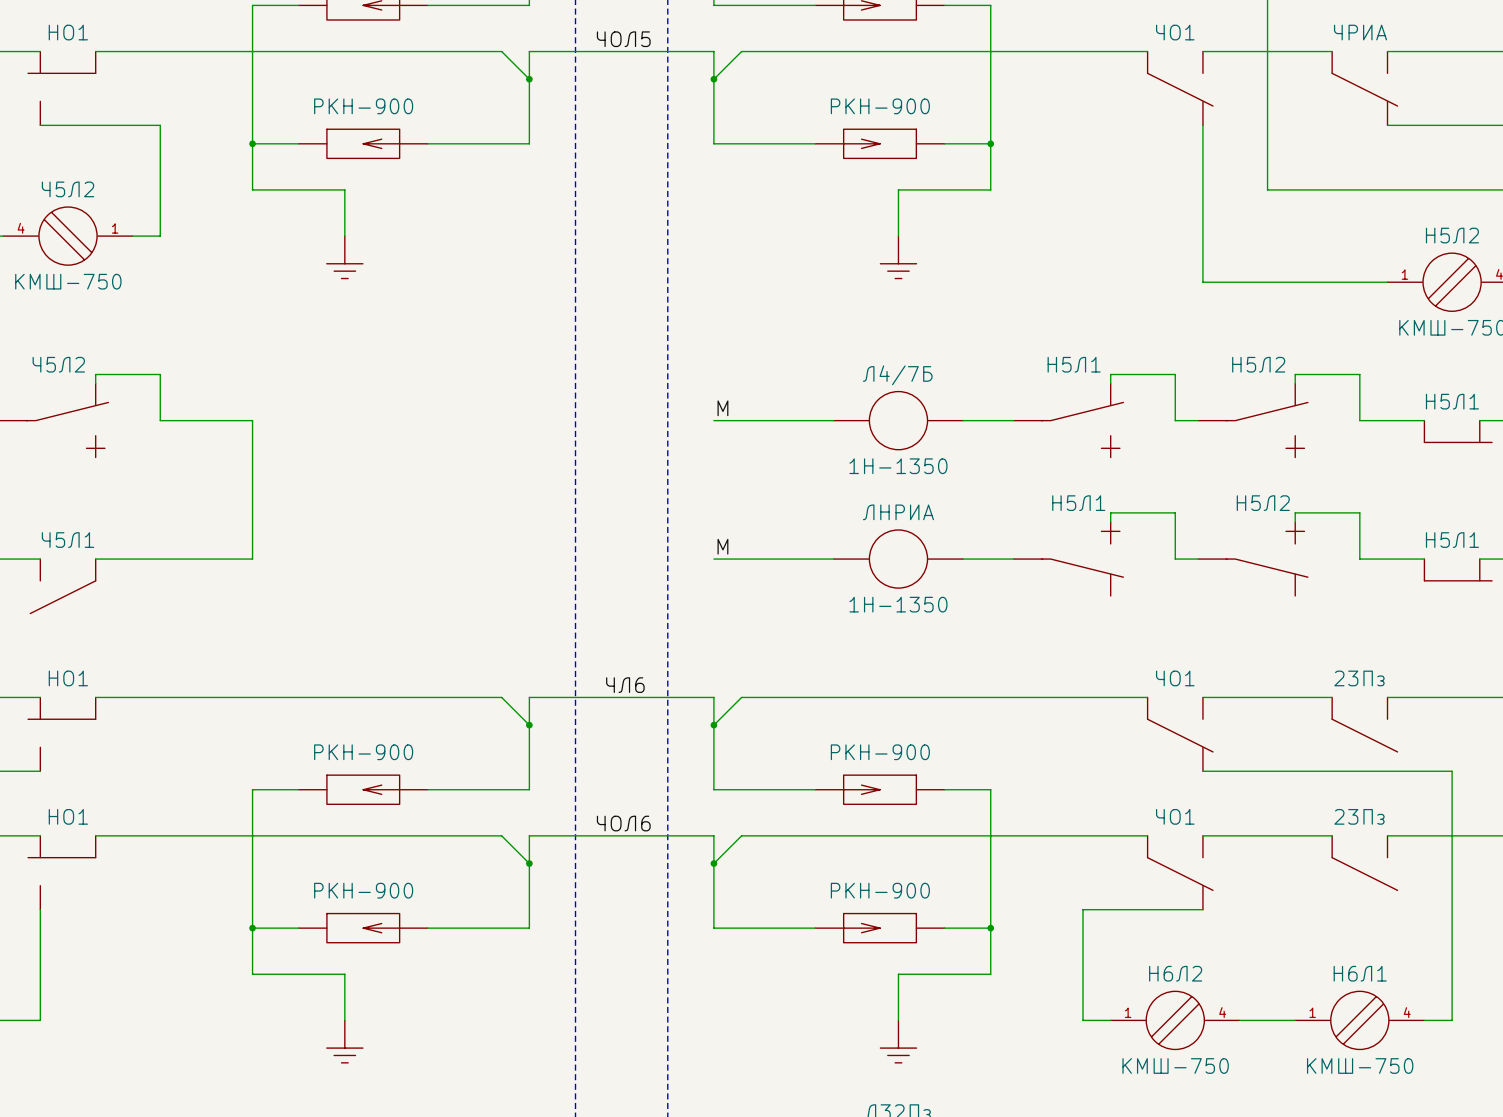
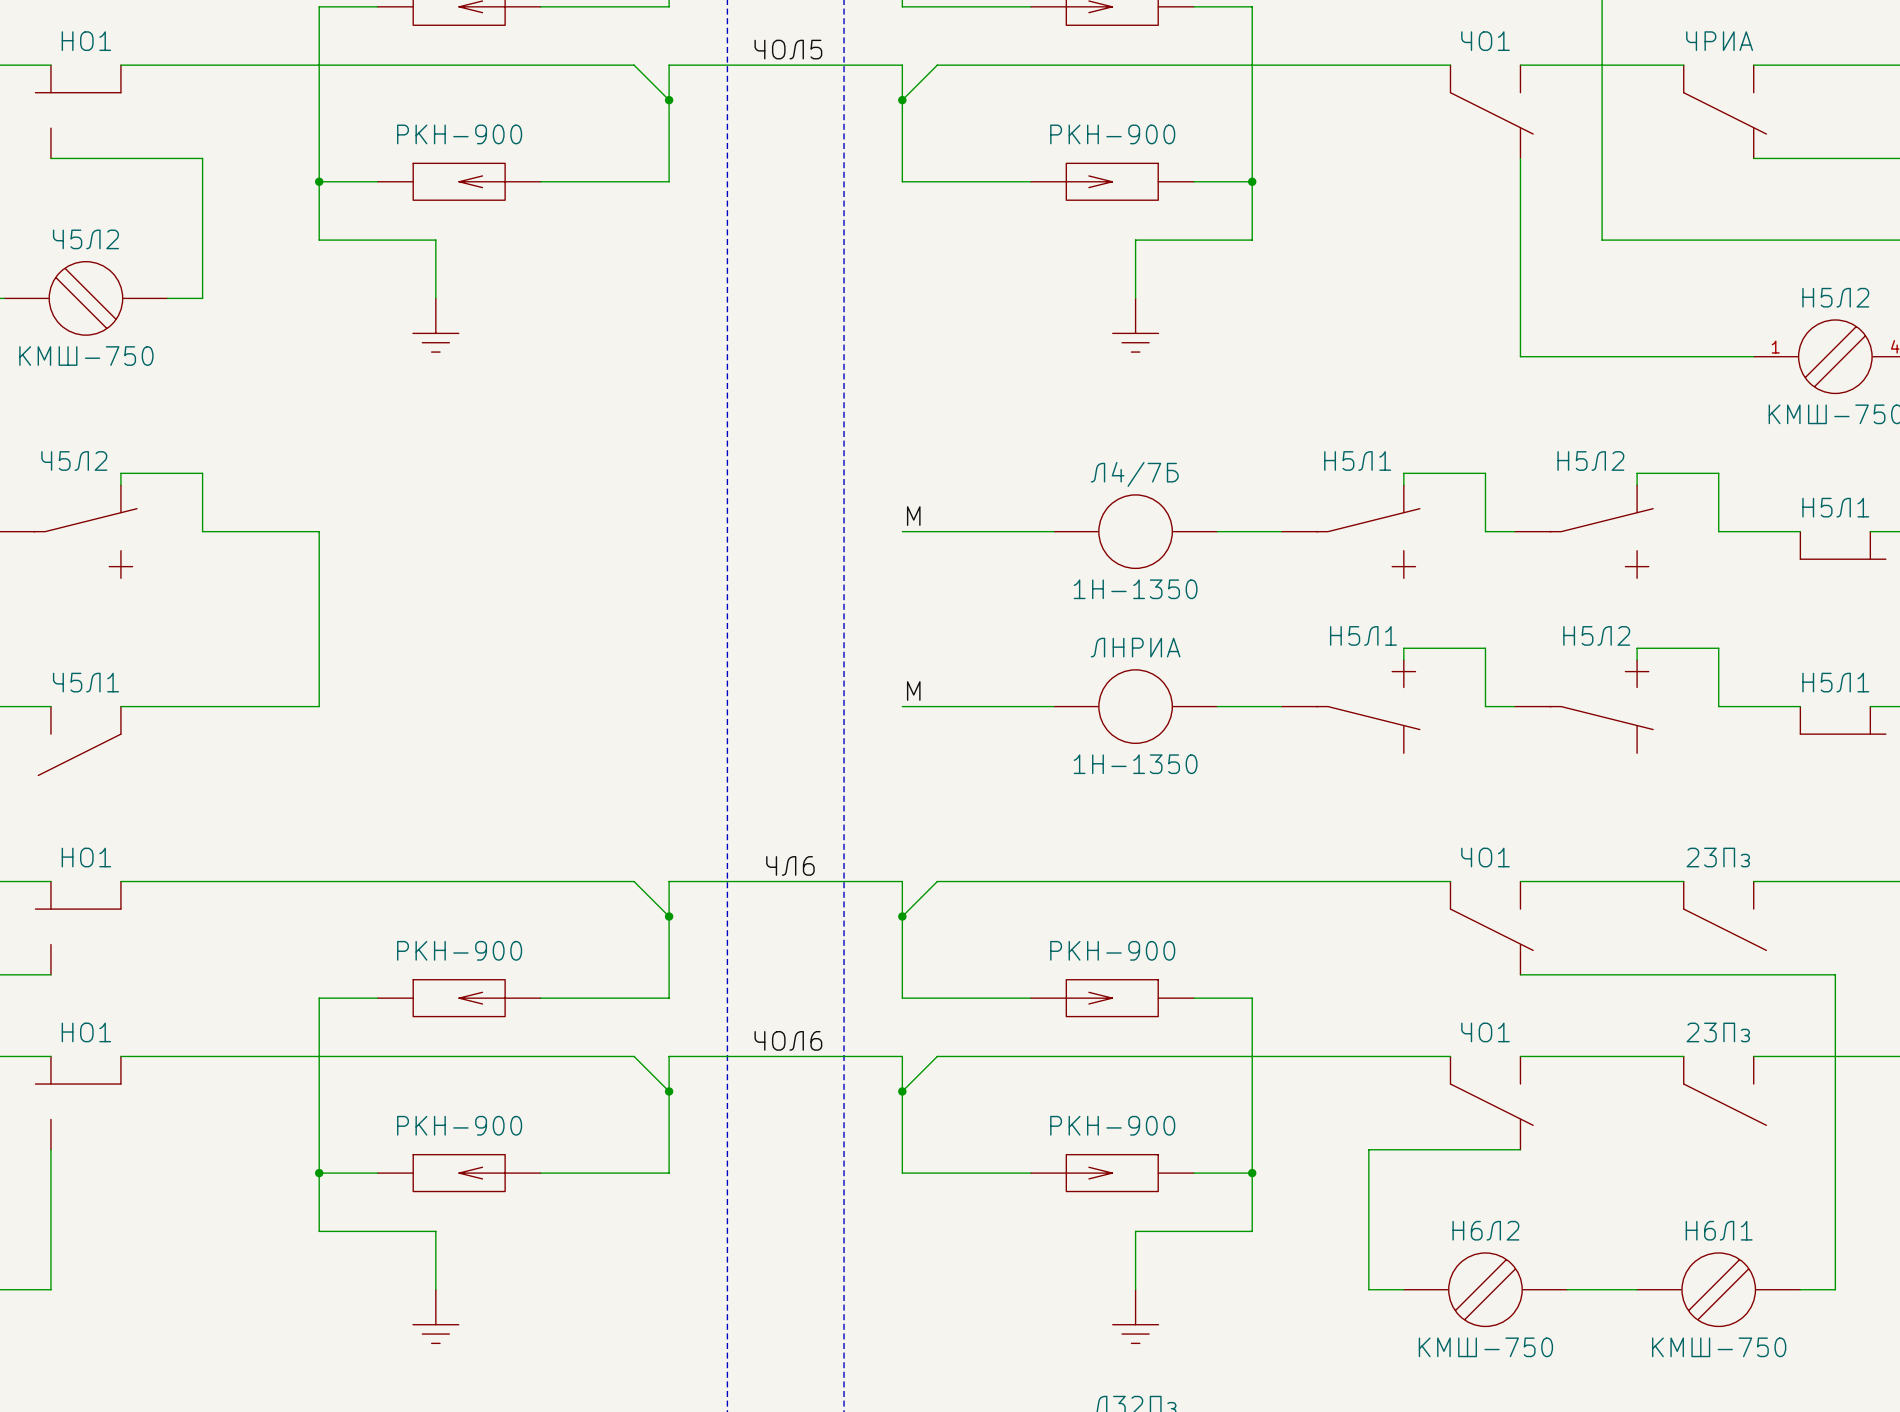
part pin number: 4 (21, 228) -> none
part pin number: 1 (115, 228) -> none
part pin number: 1 (1128, 1012) -> none
part pin number: 4 (1222, 1012) -> none
part pin number: 1 (1312, 1012) -> none
part pin number: 4 (1407, 1012) -> none

